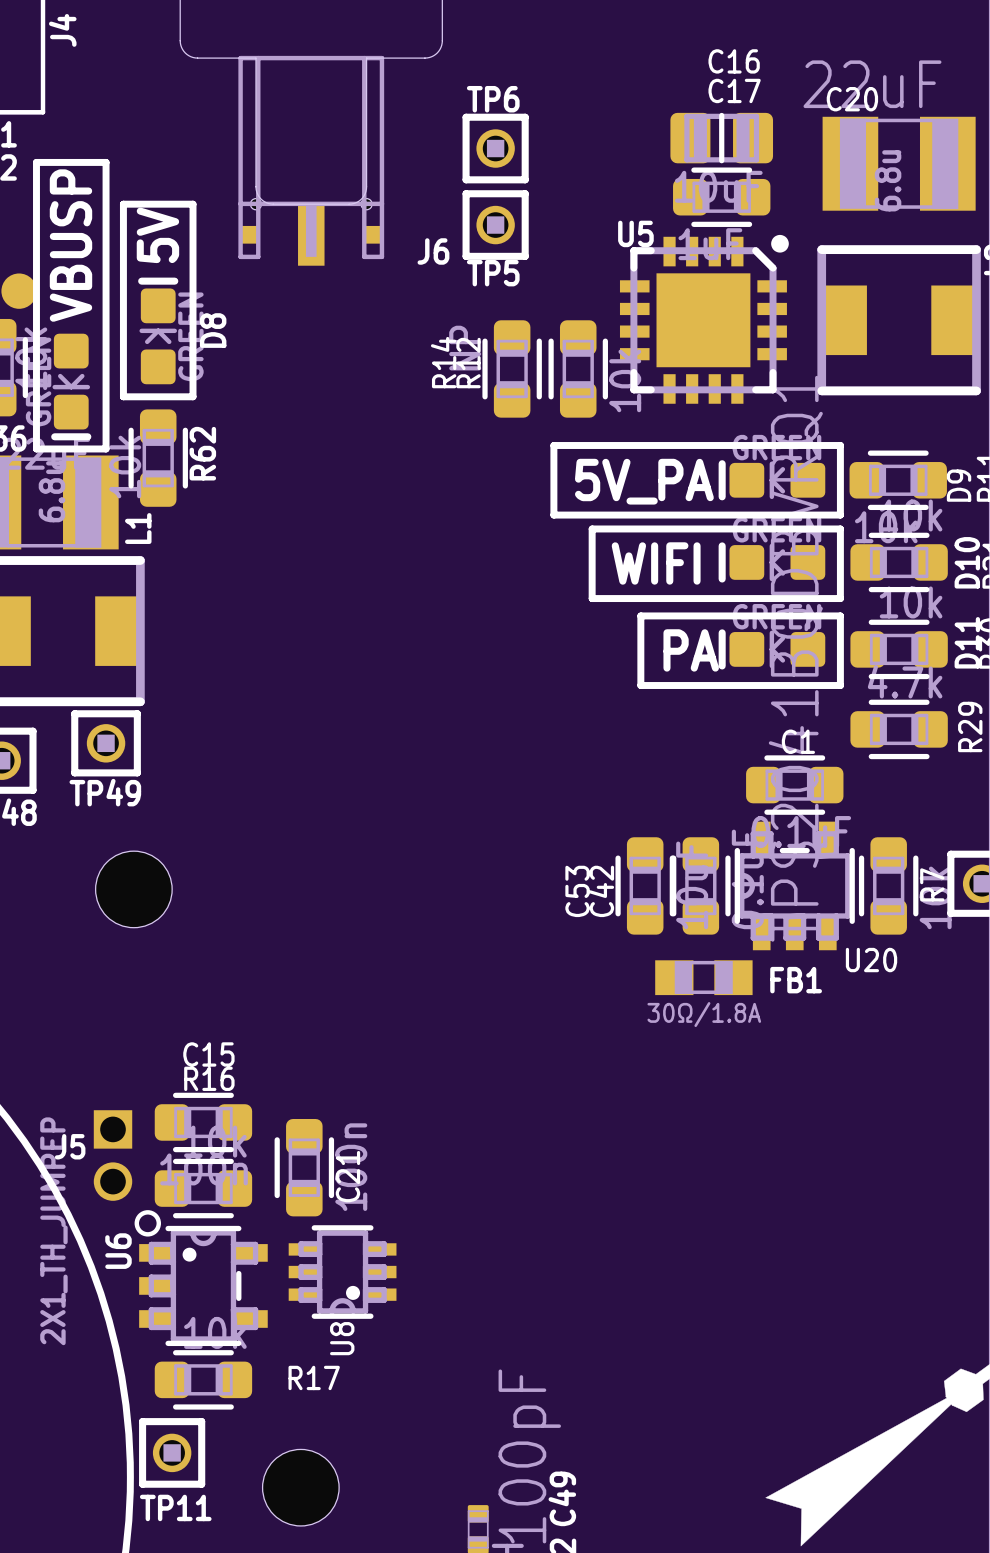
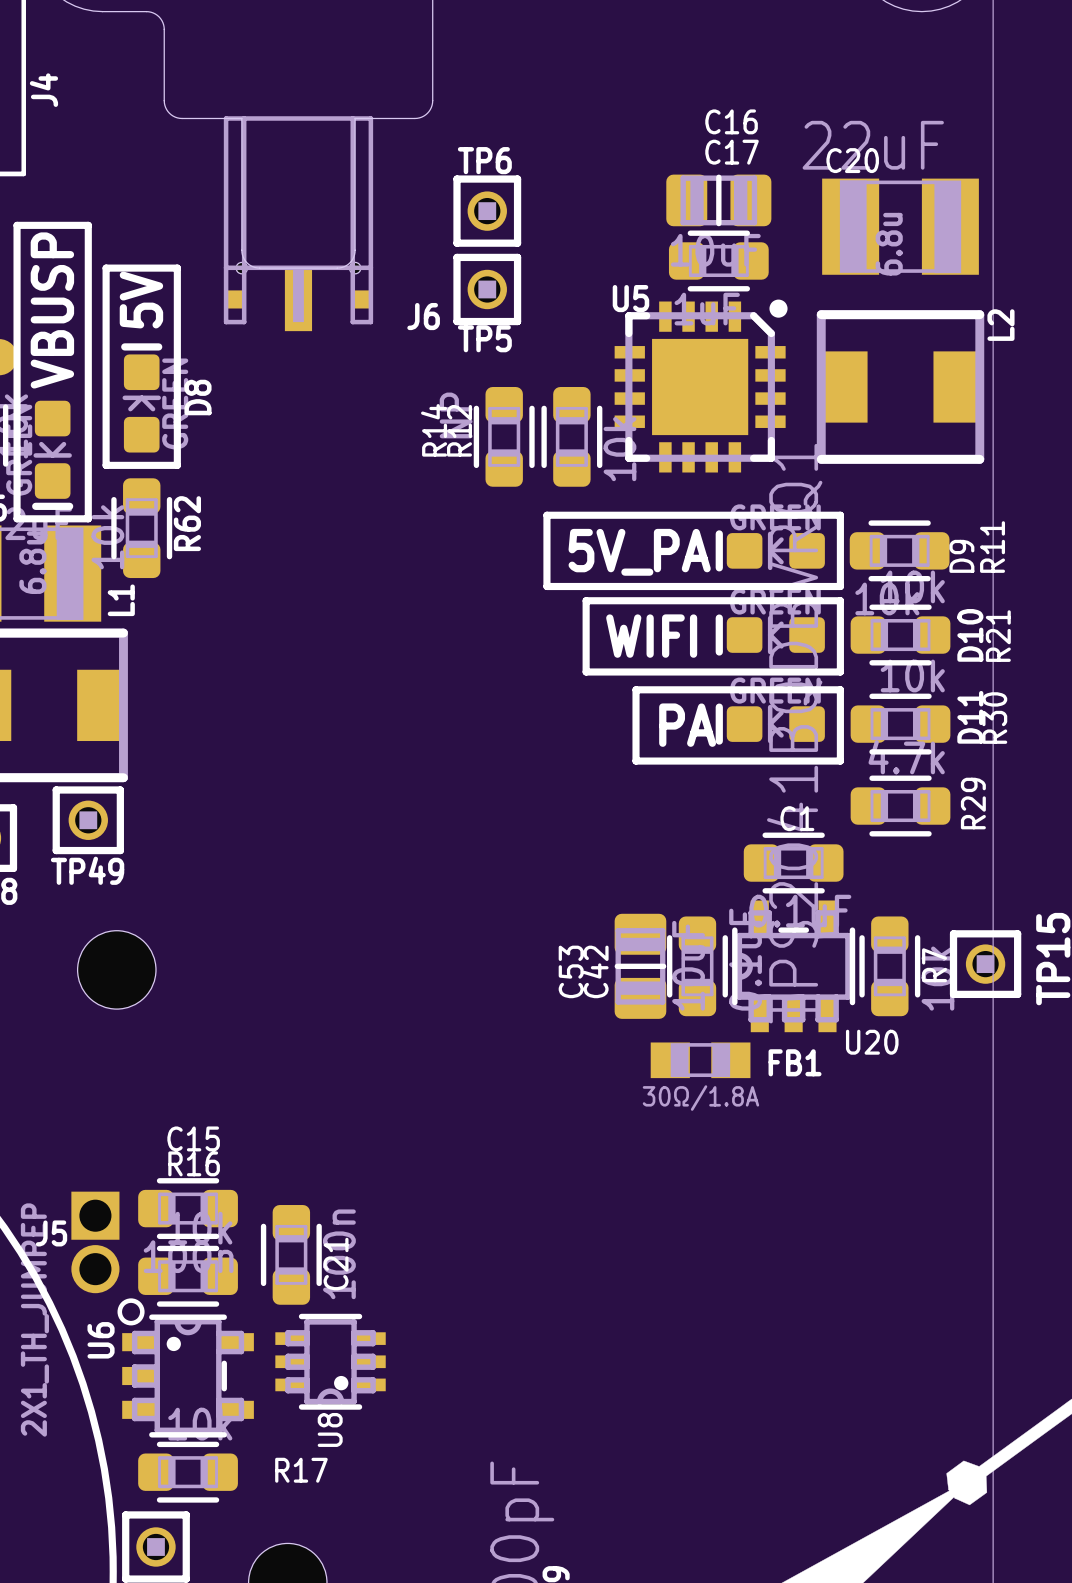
C53 footprint: [615, 837, 675, 935] -> [614, 913, 667, 1019]
J5 footprint: [93, 1110, 133, 1201] -> [71, 1191, 120, 1294]

